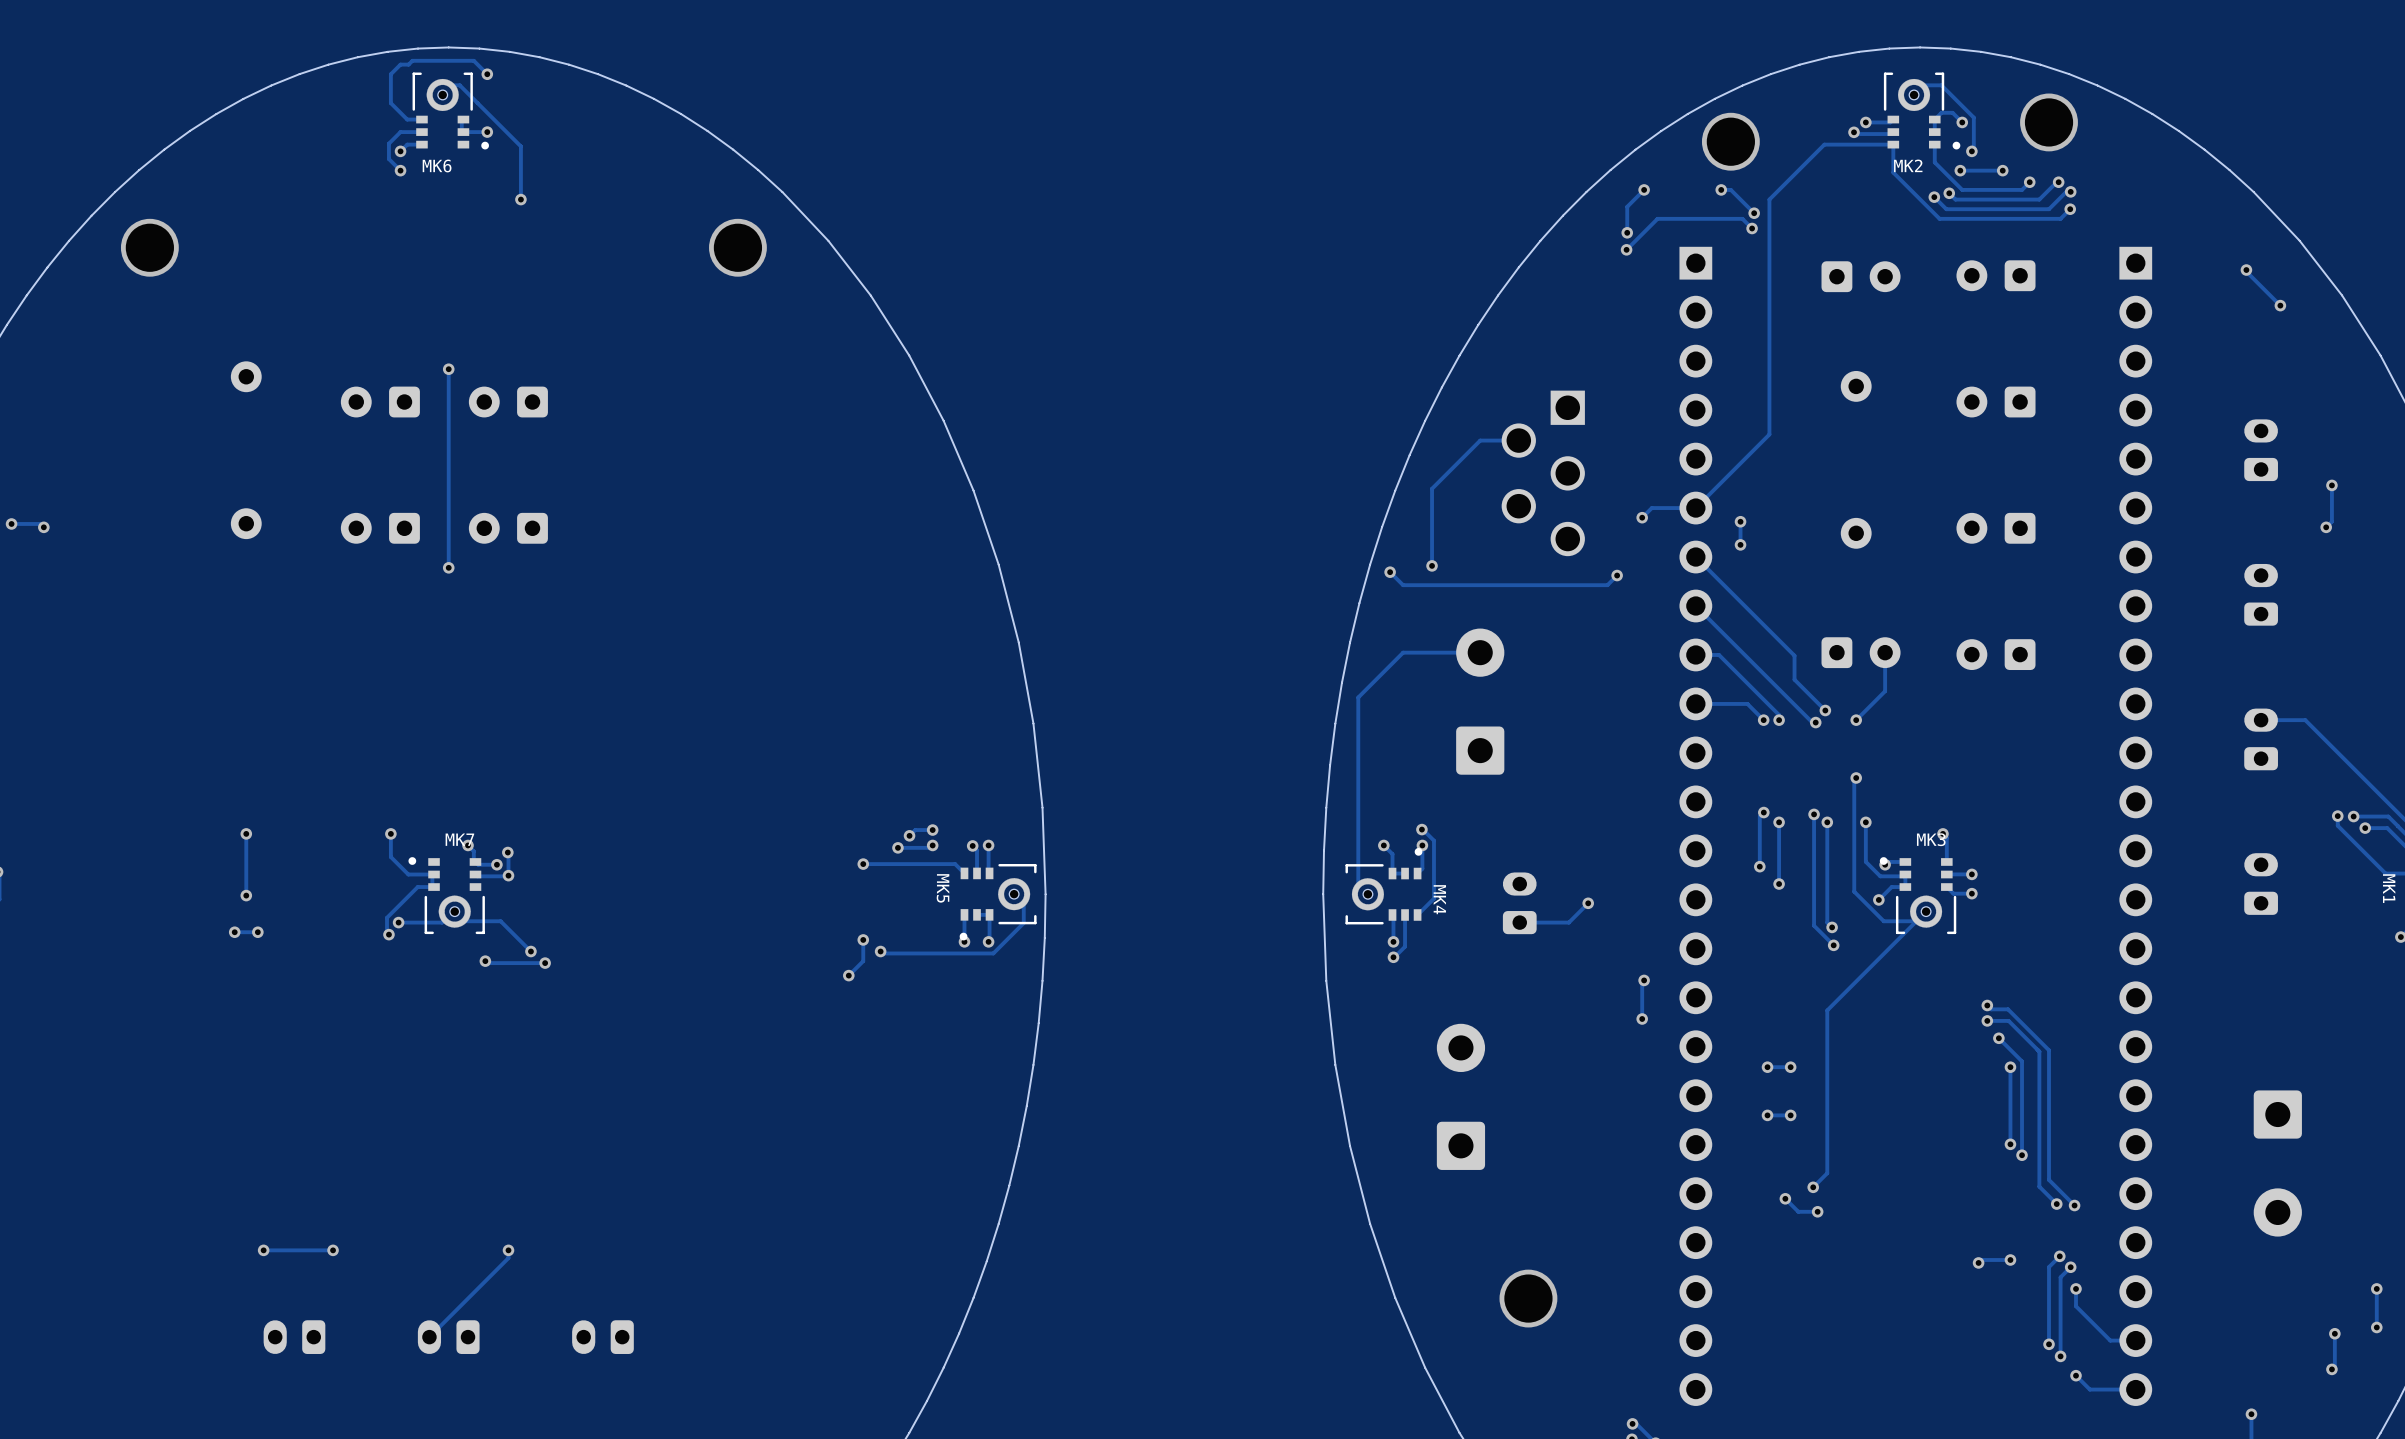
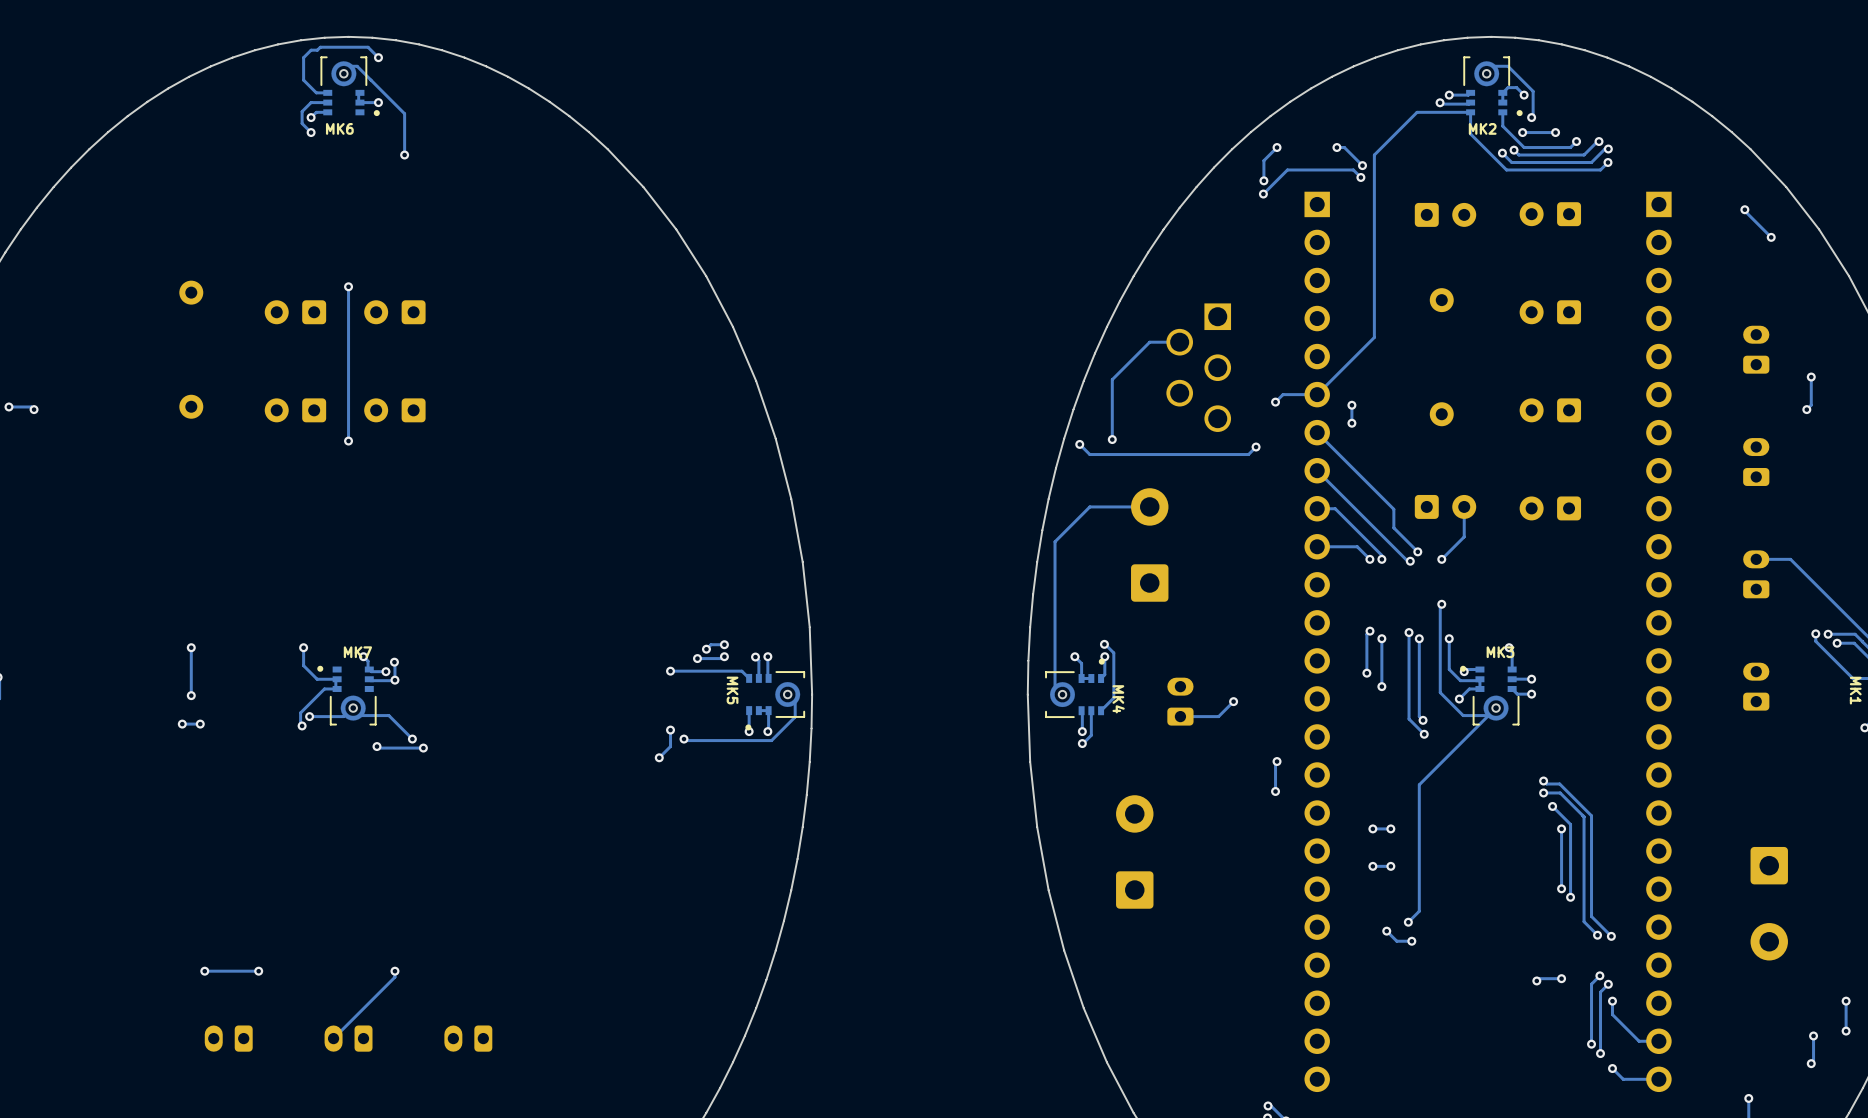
via: (2049, 122) -> none
via: (1730, 141) -> none
via: (149, 247) -> none
via: (737, 247) -> none
via: (1528, 1298) -> none

